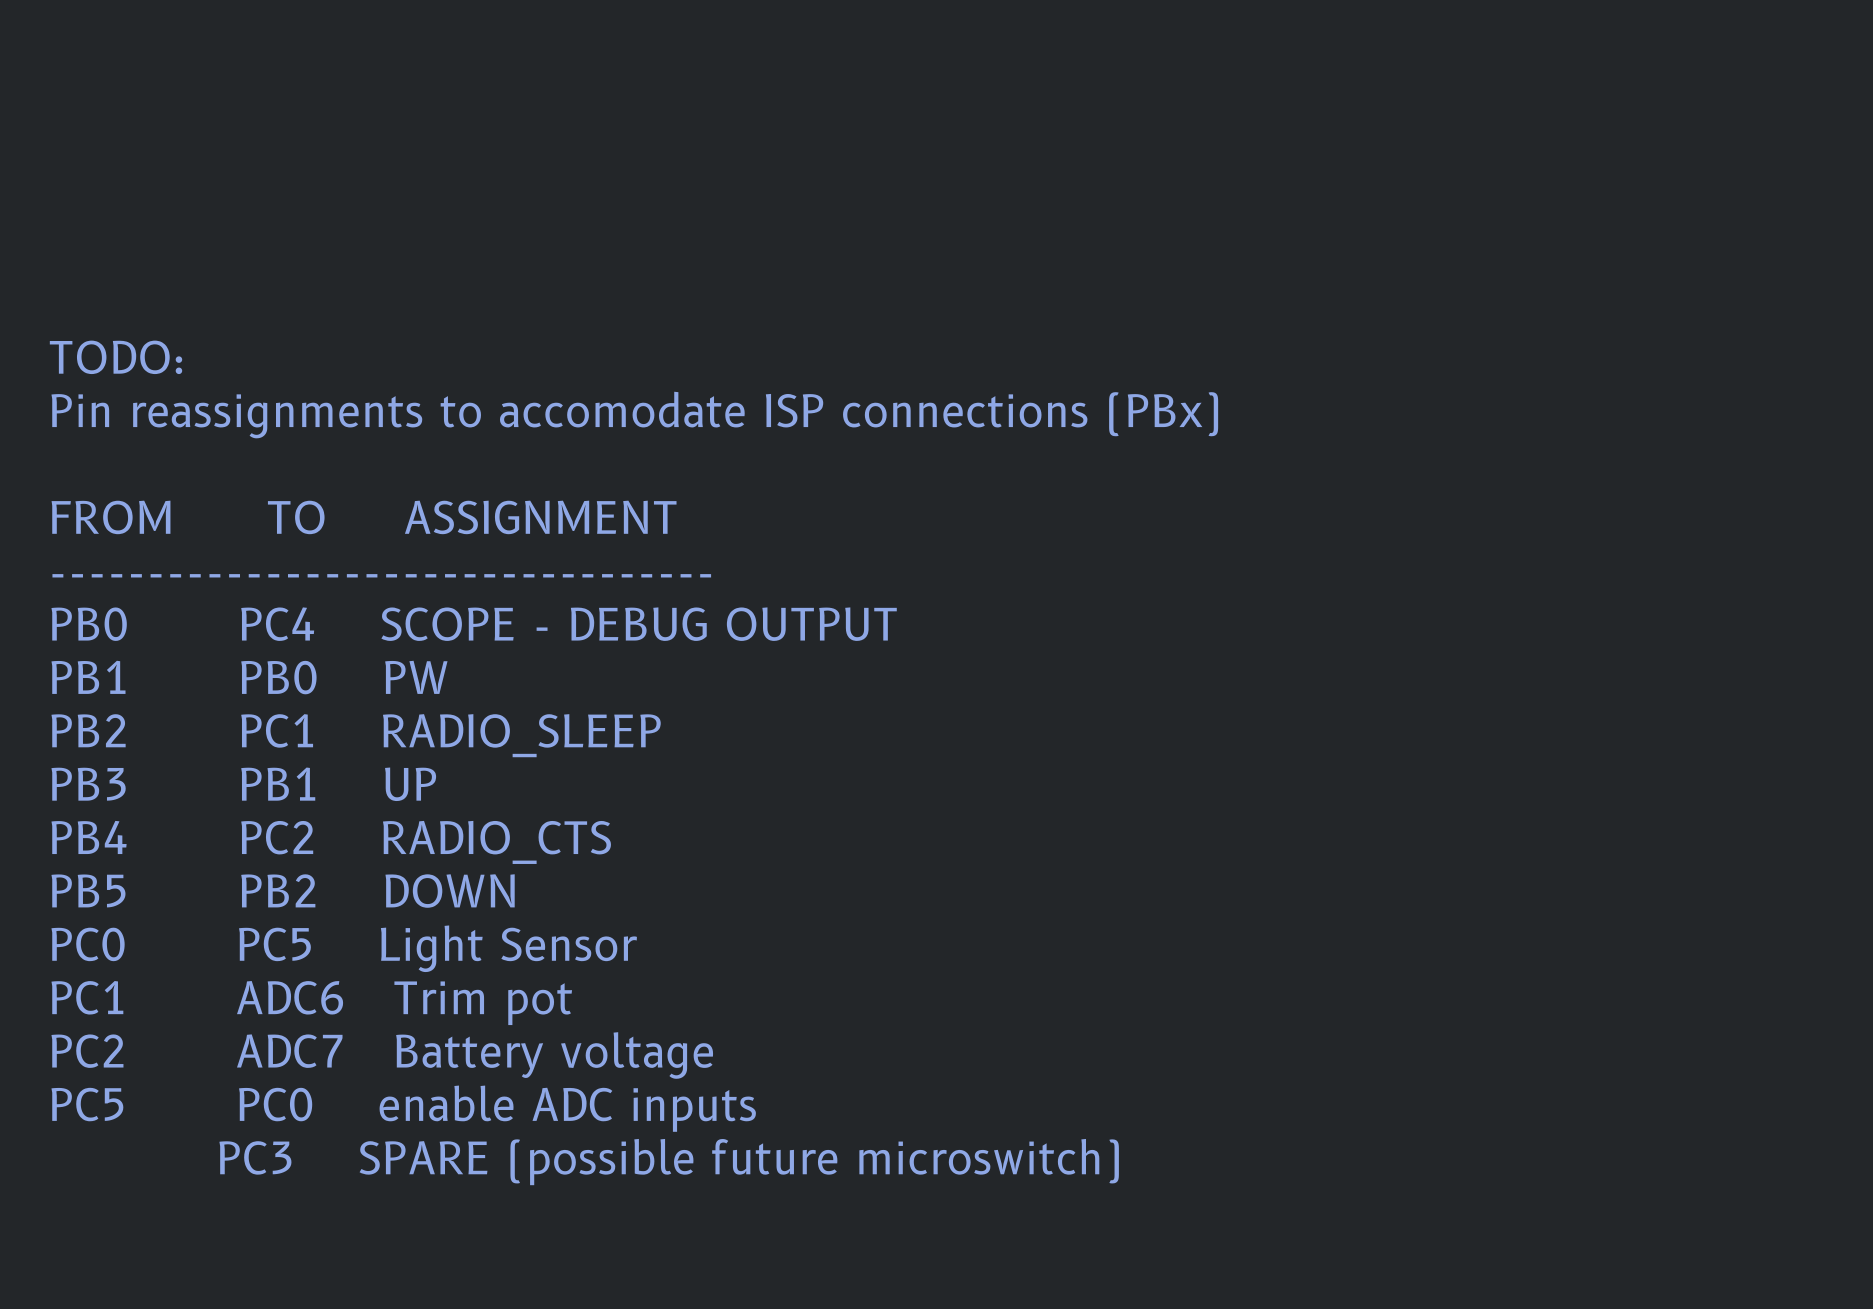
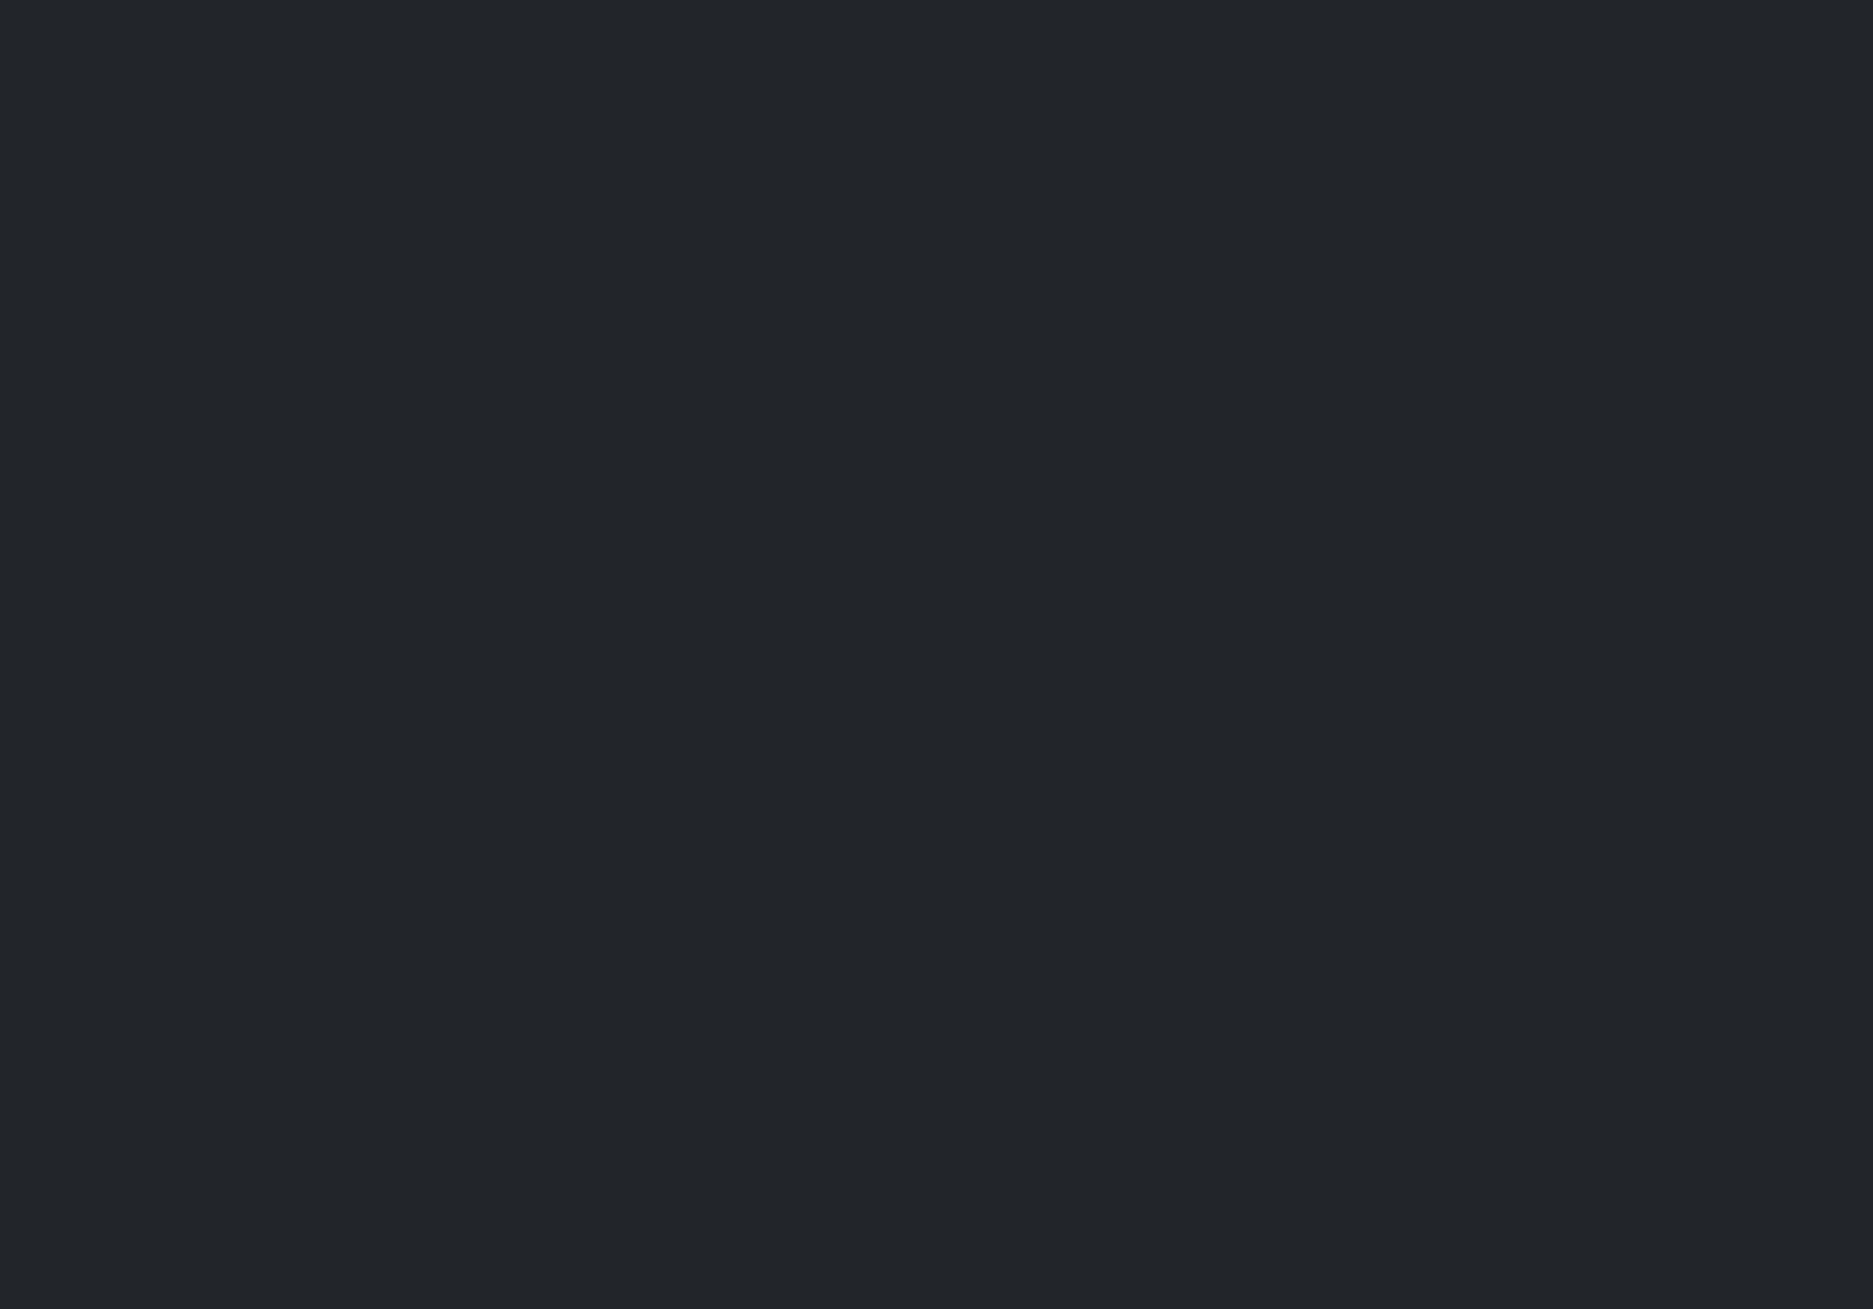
text: TODO: (116, 357) -> none
text: Pin reassignments to accomodate ISP connections (PBx) (634, 415) -> none
text: FROM TO ASSIGNMENT (364, 517) -> none
text: ---------------------------------- (381, 575) -> none
text: PB0 PC4 SCOPE - DEBUG OUTPUT (474, 624) -> none
text: PB1 PB0 PW (249, 677) -> none
text: PB2 PC1 RADIO_SLEEP (356, 735) -> none
text: PB3 PB1 UP (243, 784) -> none
text: PB4 PC2 RADIO_CTS (331, 842) -> none
text: PB5 PB2 DOWN (283, 891) -> none
text: PC0 PC5 Light Sensor (344, 948) -> none
text: PC1 ADC6 Trim pot (311, 1003) -> none
text: PC2 ADC7 Battery voltage (382, 1055) -> none
text: PC5 PC0 enable ADC inputs (403, 1108) -> none
text: PC3 SPARE (possible future microswitch) (669, 1162) -> none

